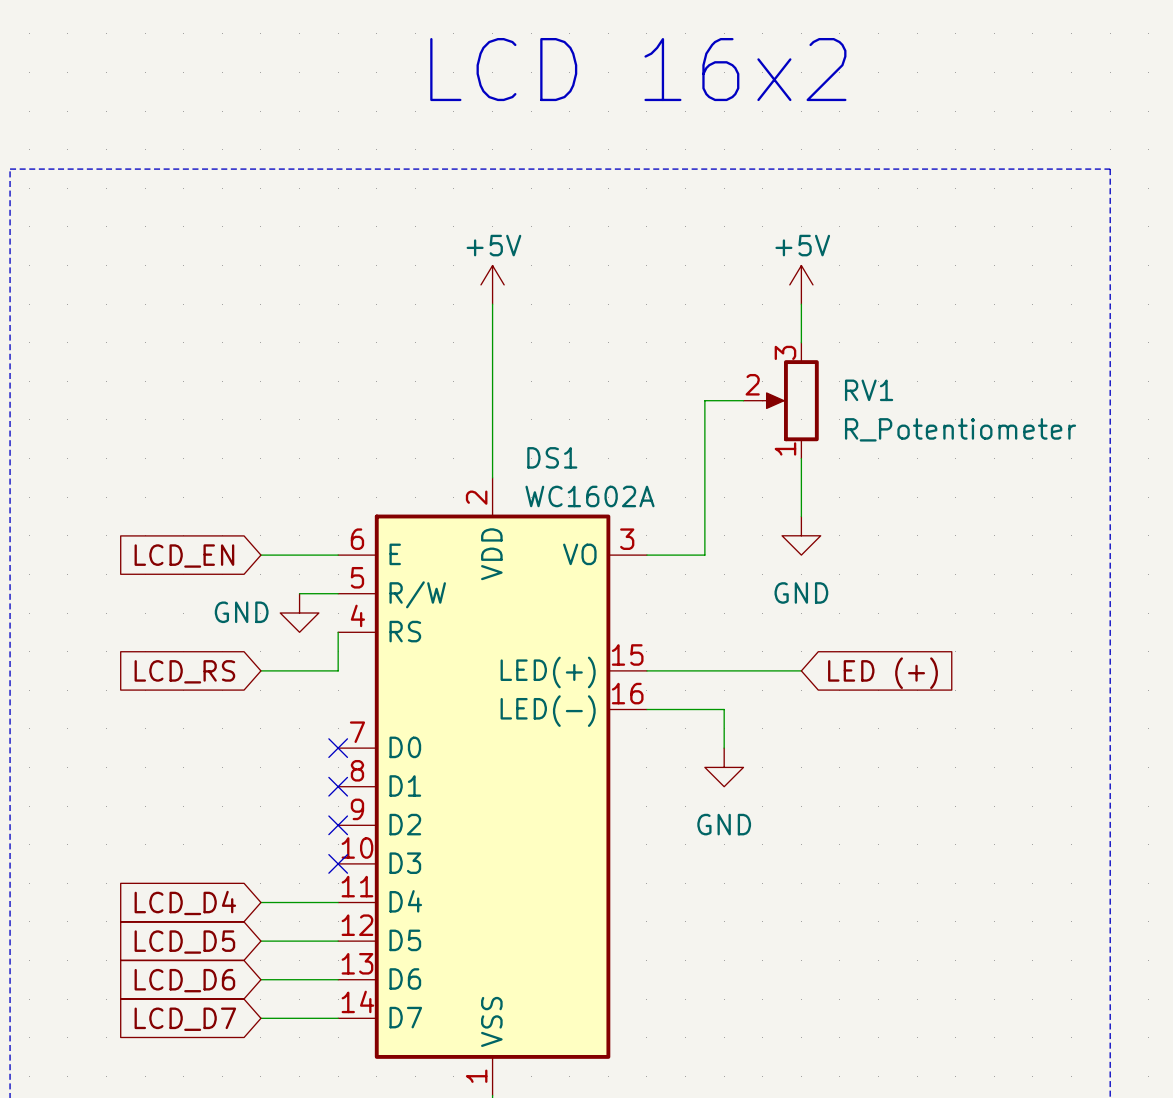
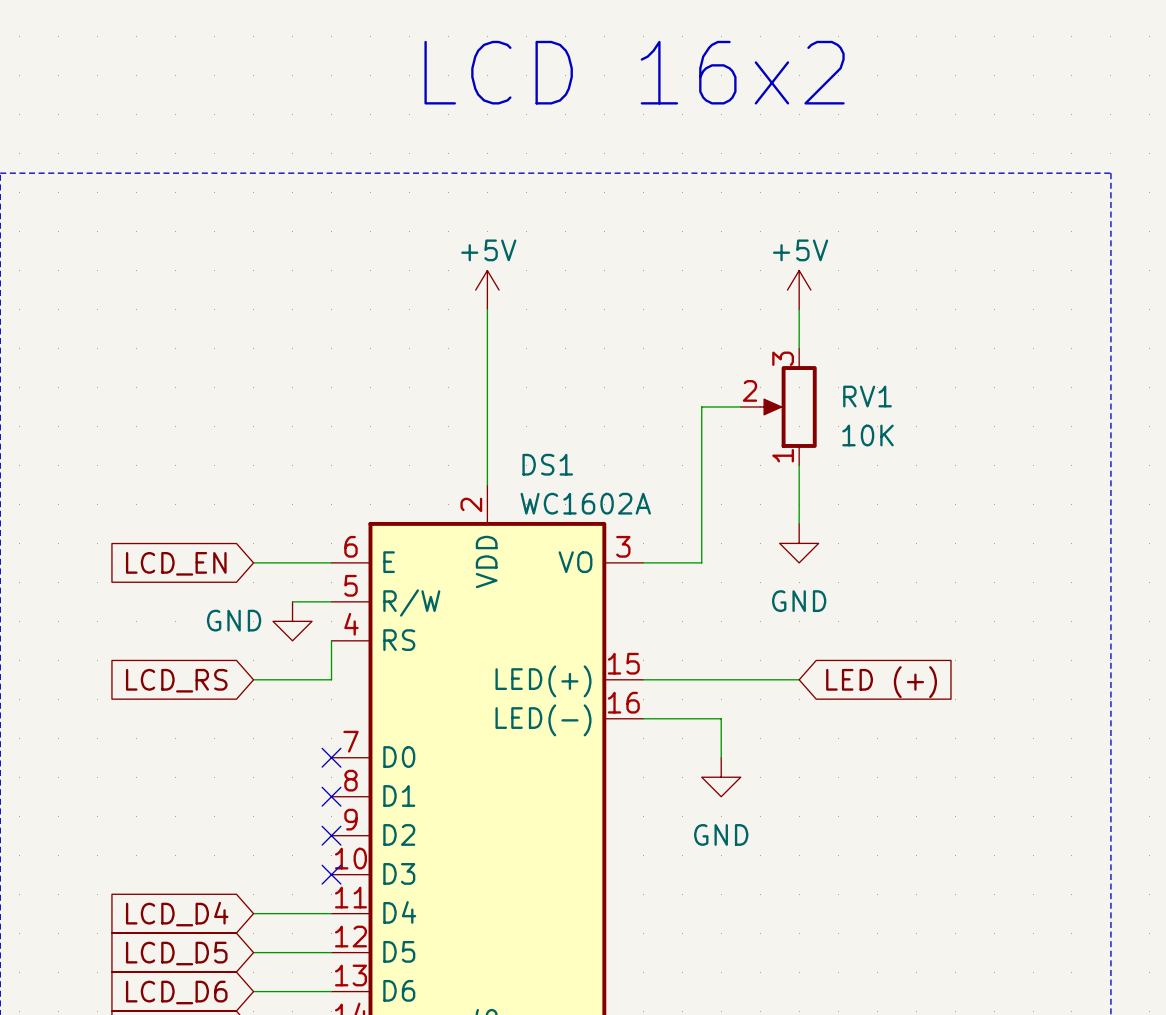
RV1 value: R_Potentiometer (960, 429) -> 10K (867, 435)

